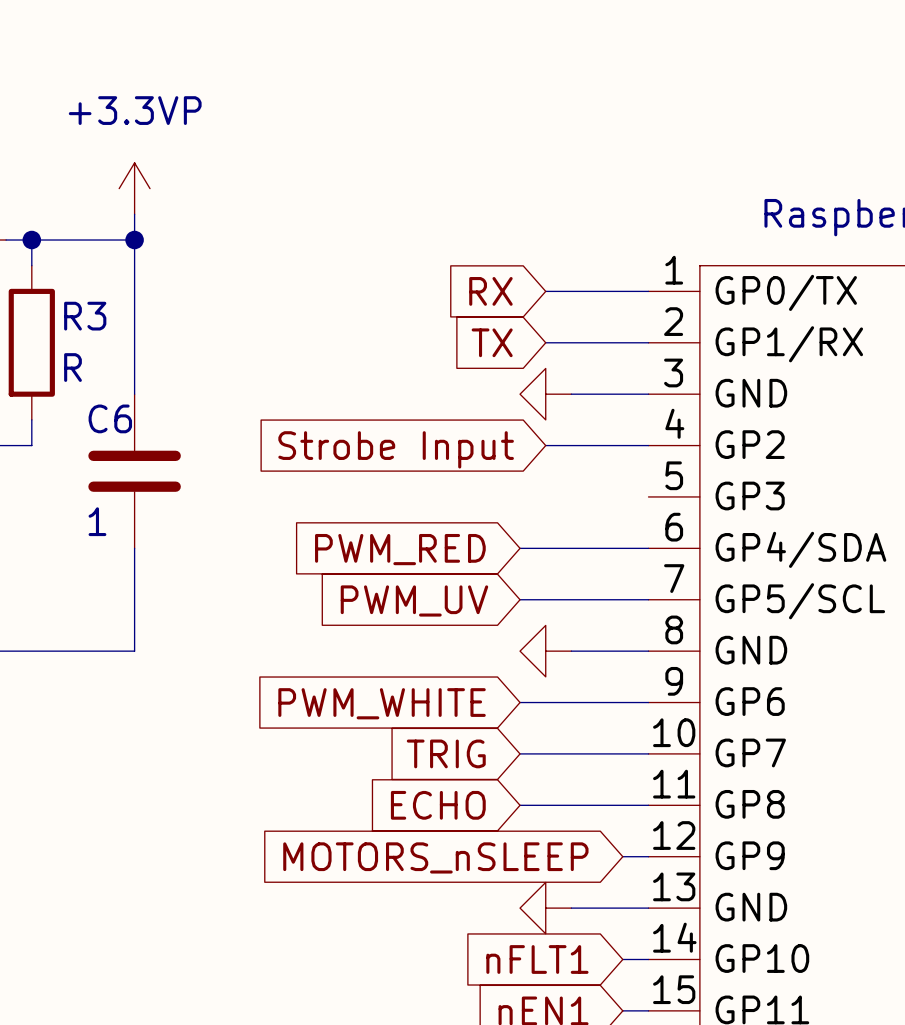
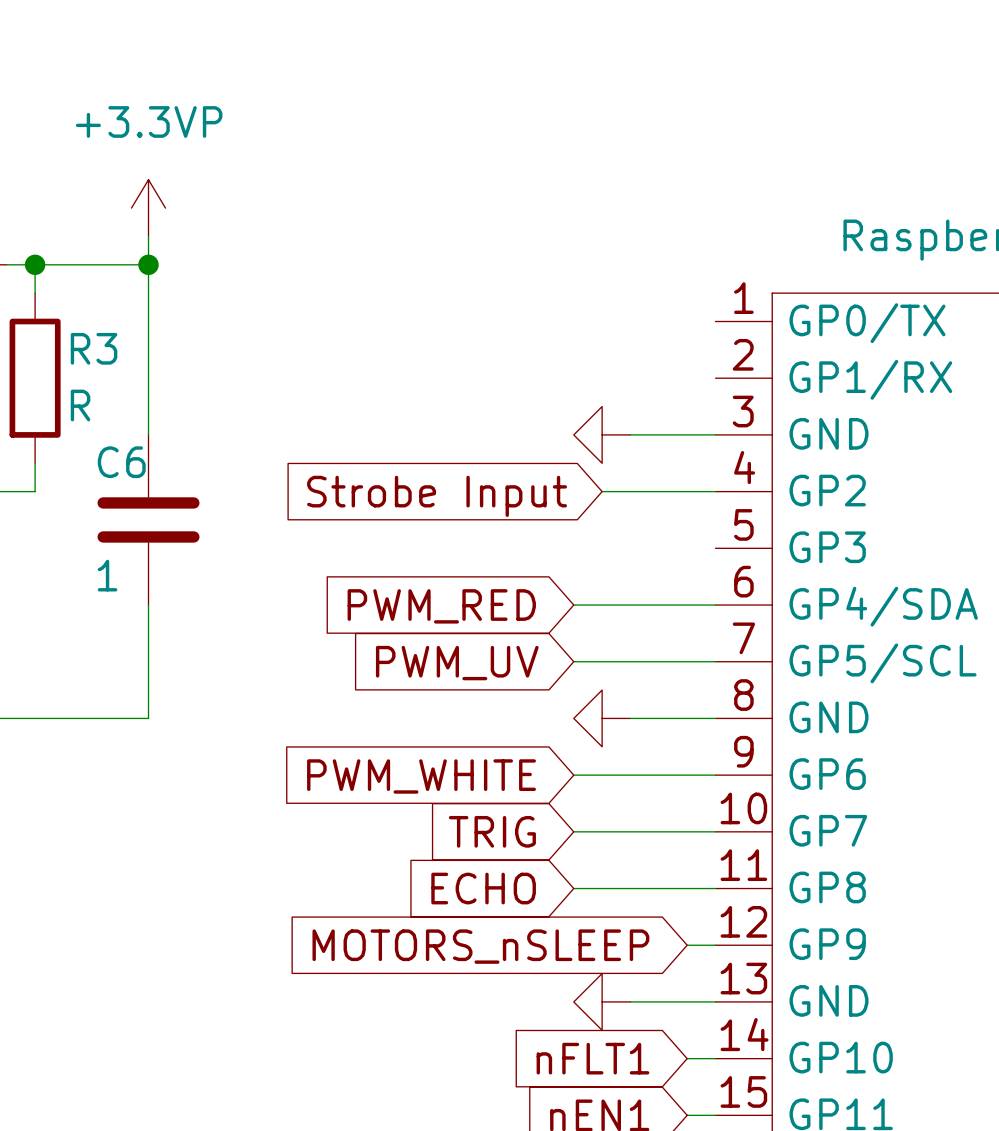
global label: RX (490, 291) -> none
wire: (545, 291) (648, 291) -> none
global label: TX (492, 342) -> none
wire: (545, 342) (648, 342) -> none

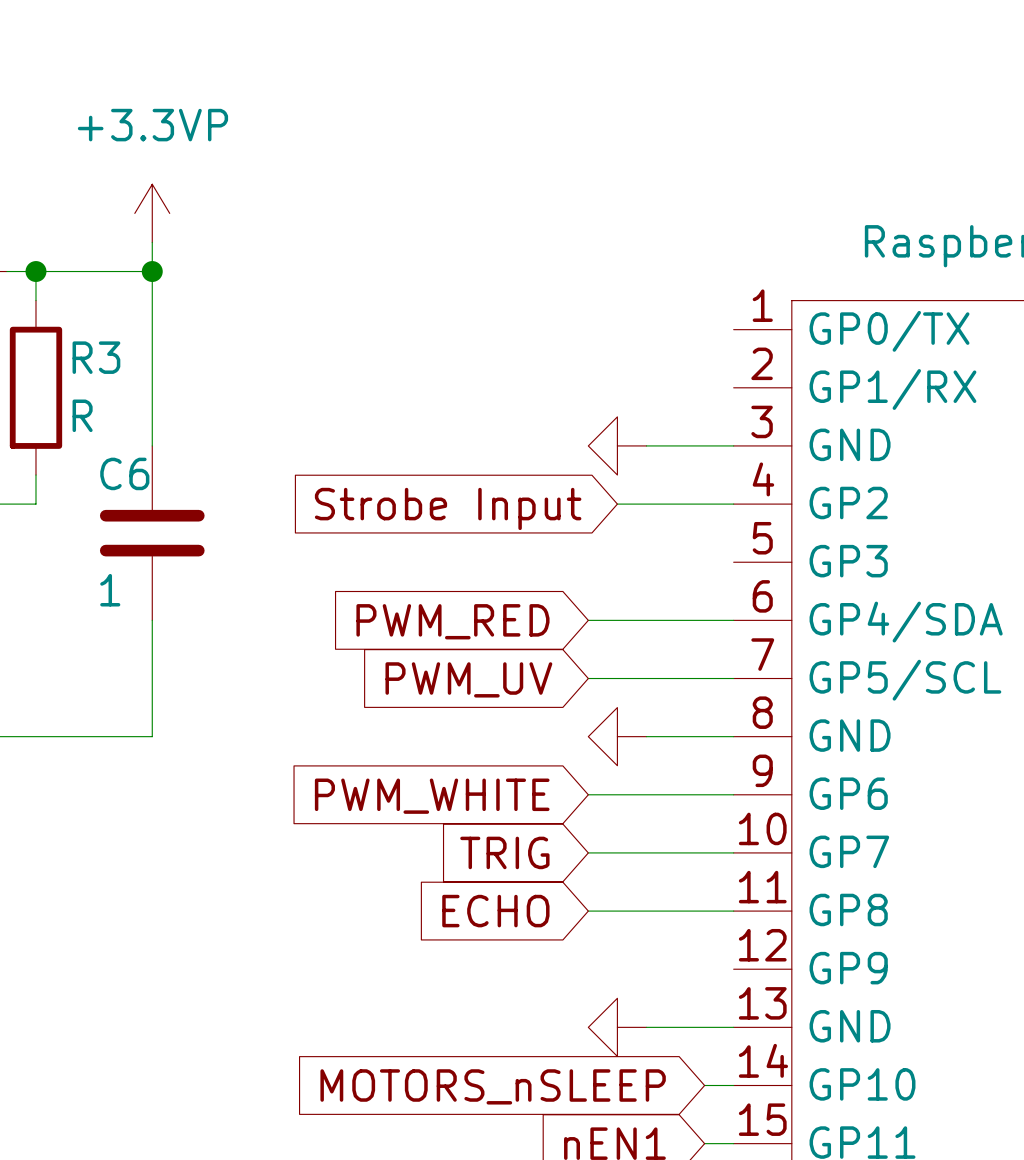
wire: (687, 945) (715, 945) -> none
global label: MOTORS_nSLEEP (480, 946) -> none
global label: nFLT1 (592, 1058) -> MOTORS_nSLEEP (493, 1086)

